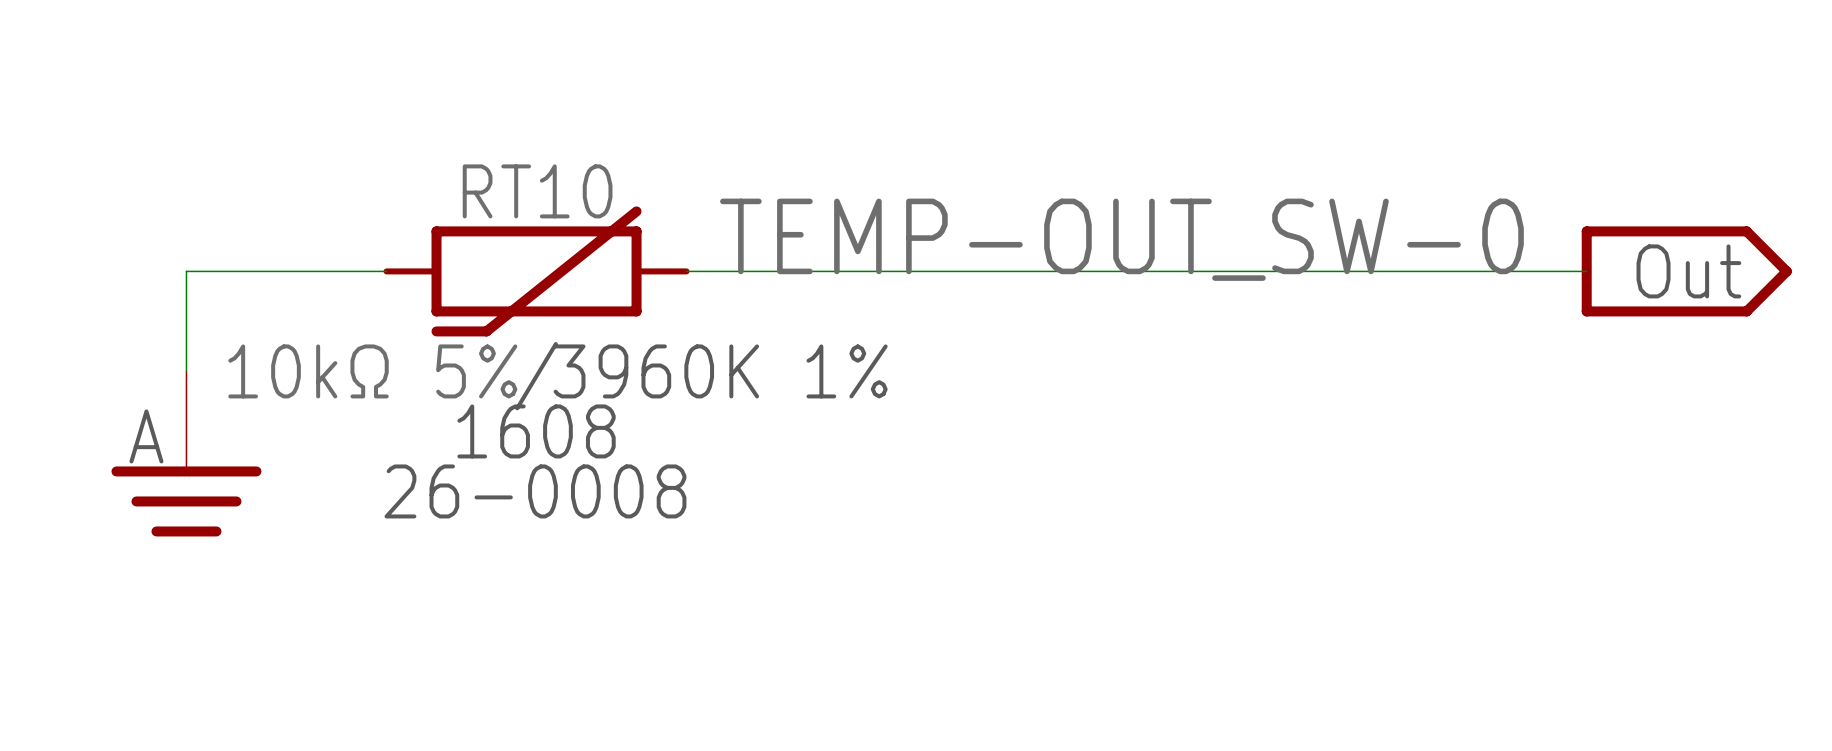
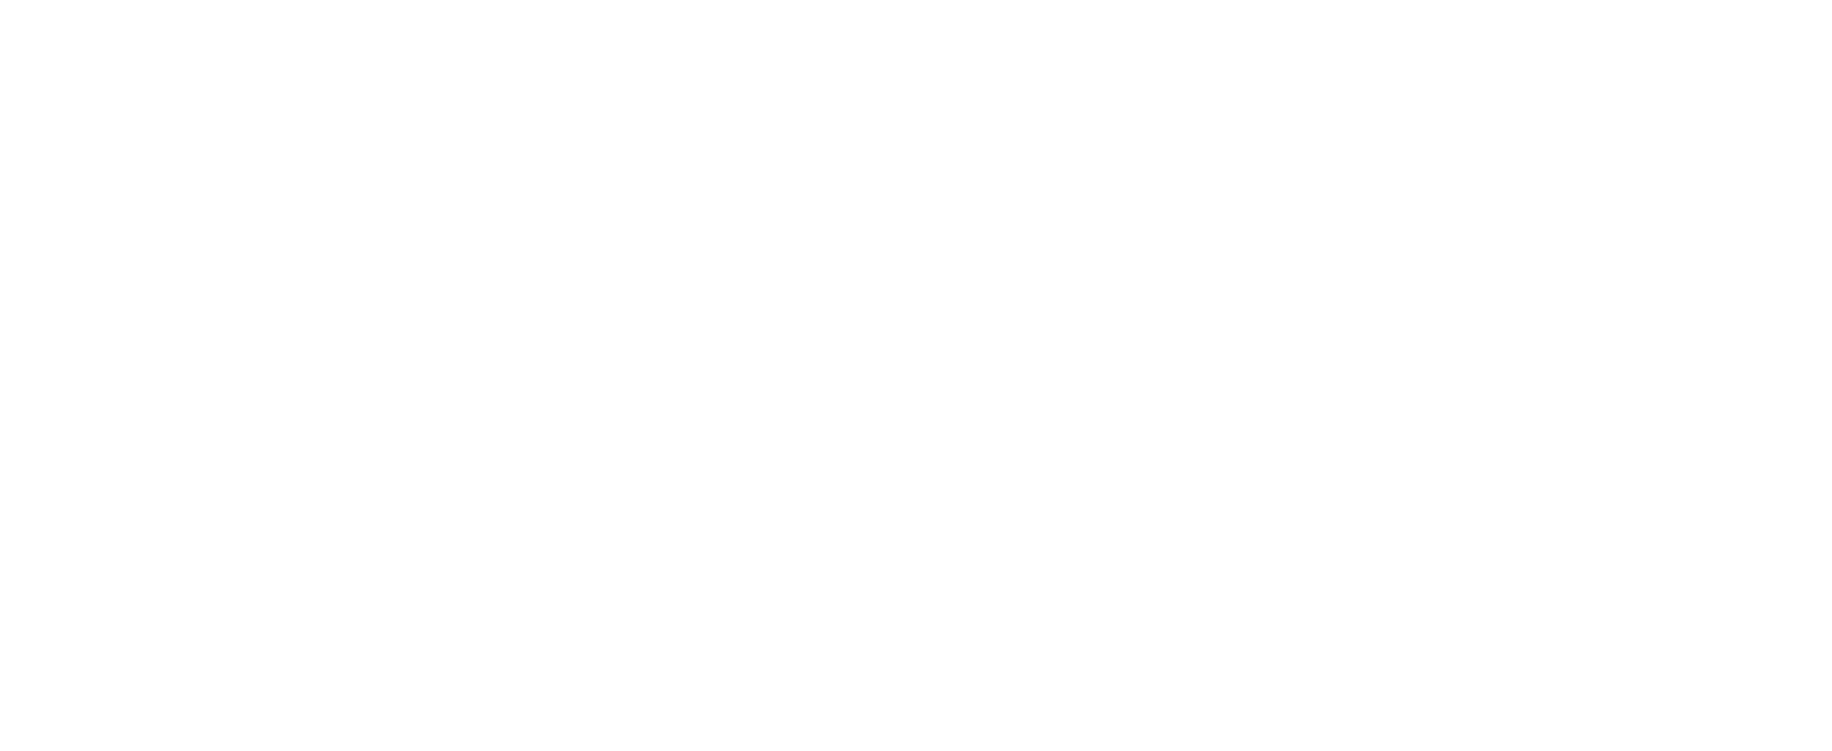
label: TEMP-OUT_SW-0 (1121, 239) -> none
wire: (386, 271) (186, 271) (186, 371) -> none
RT10: 10kΩ 5% (536, 271) -> none
wire: (686, 271) (1586, 271) -> none
part: (1686, 271) -> none
power symbol: (186, 453) -> none

